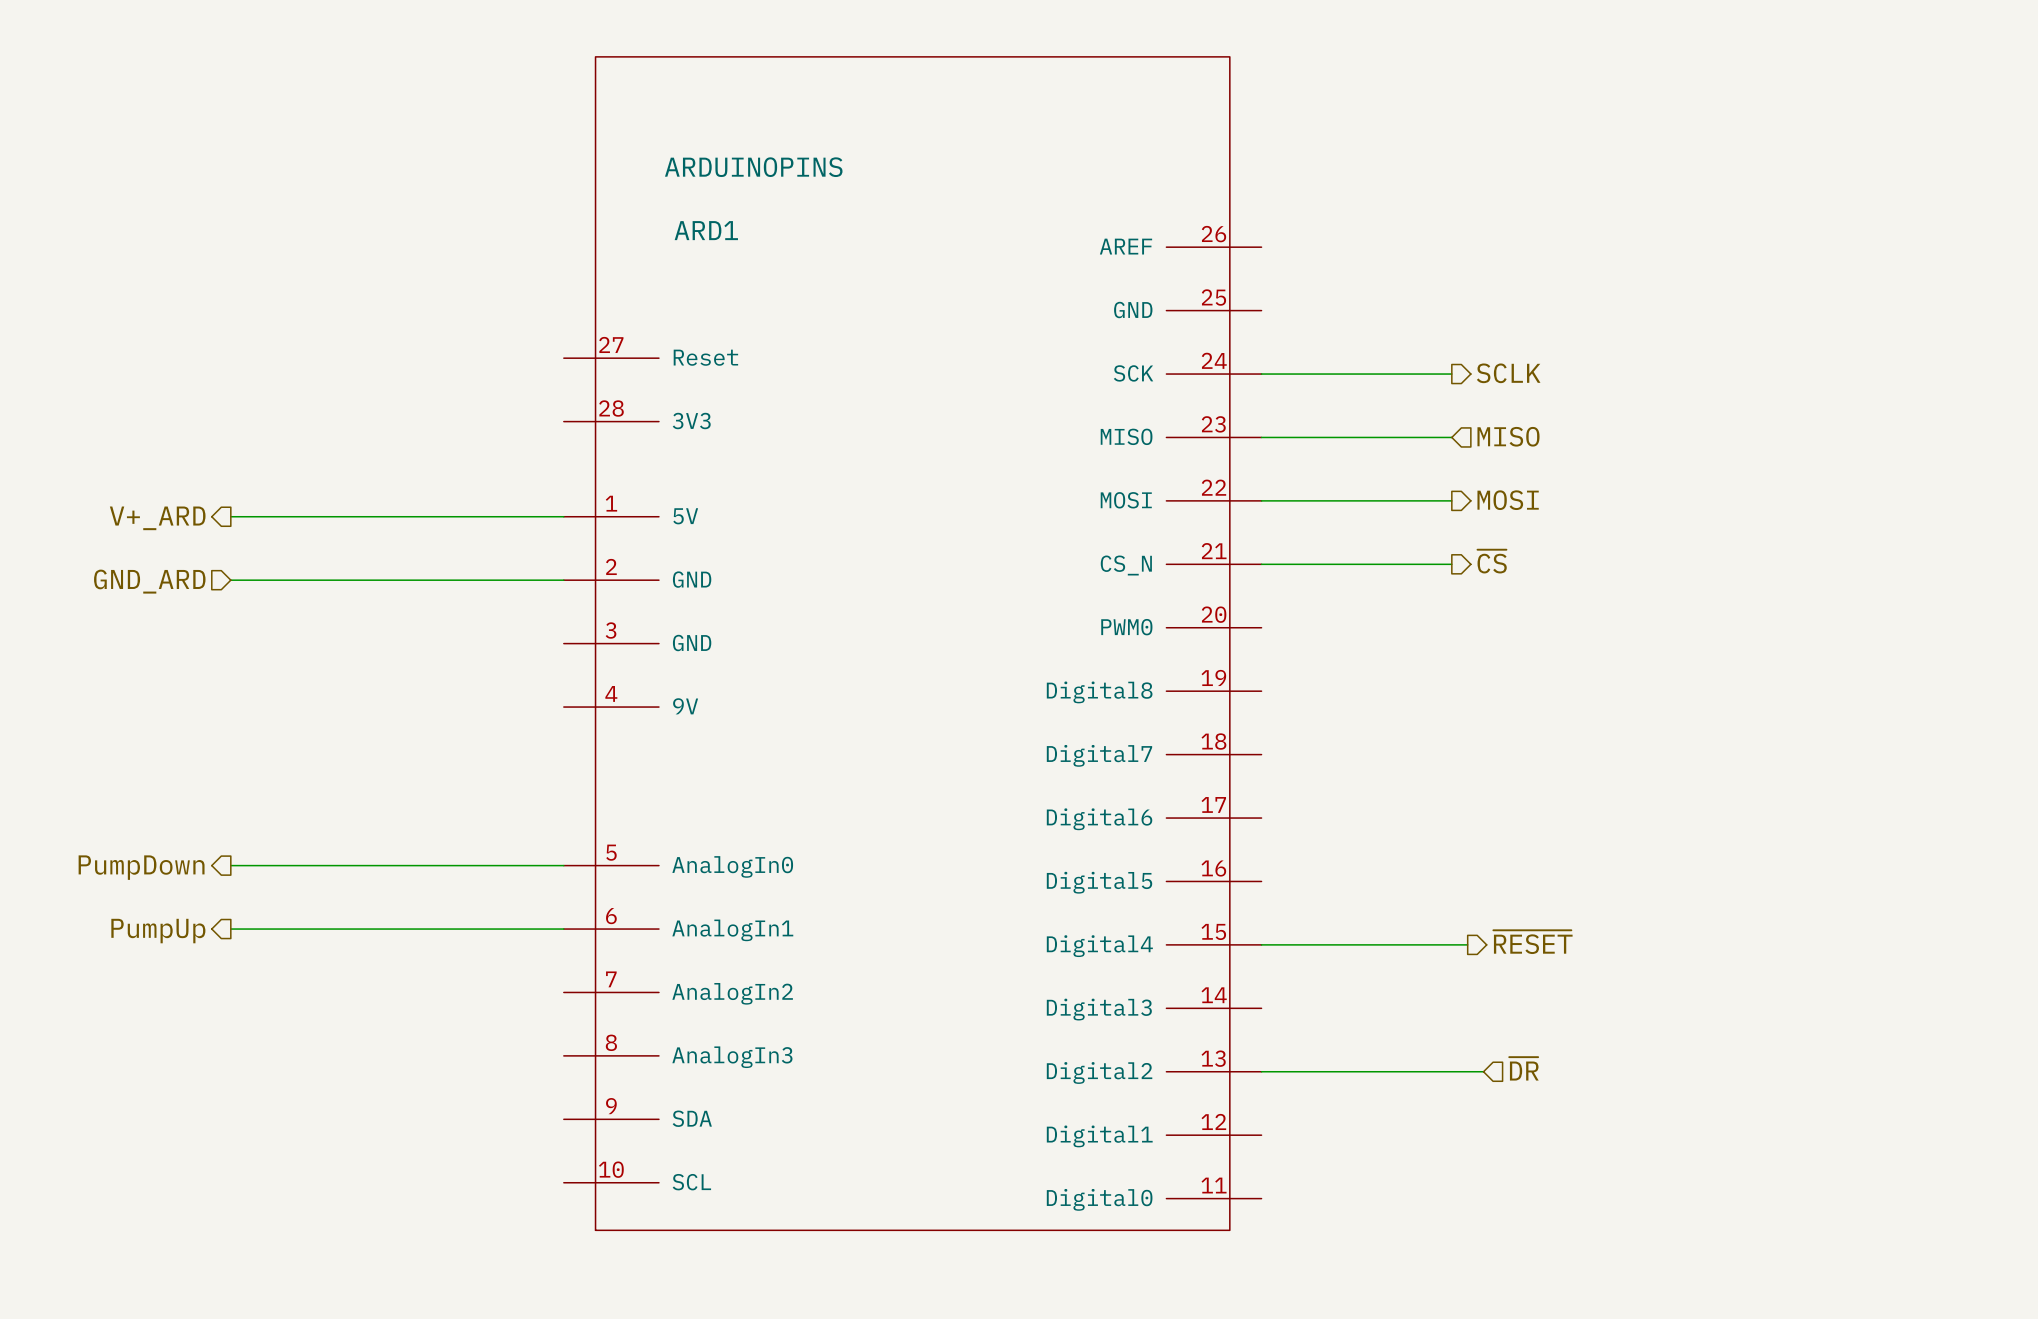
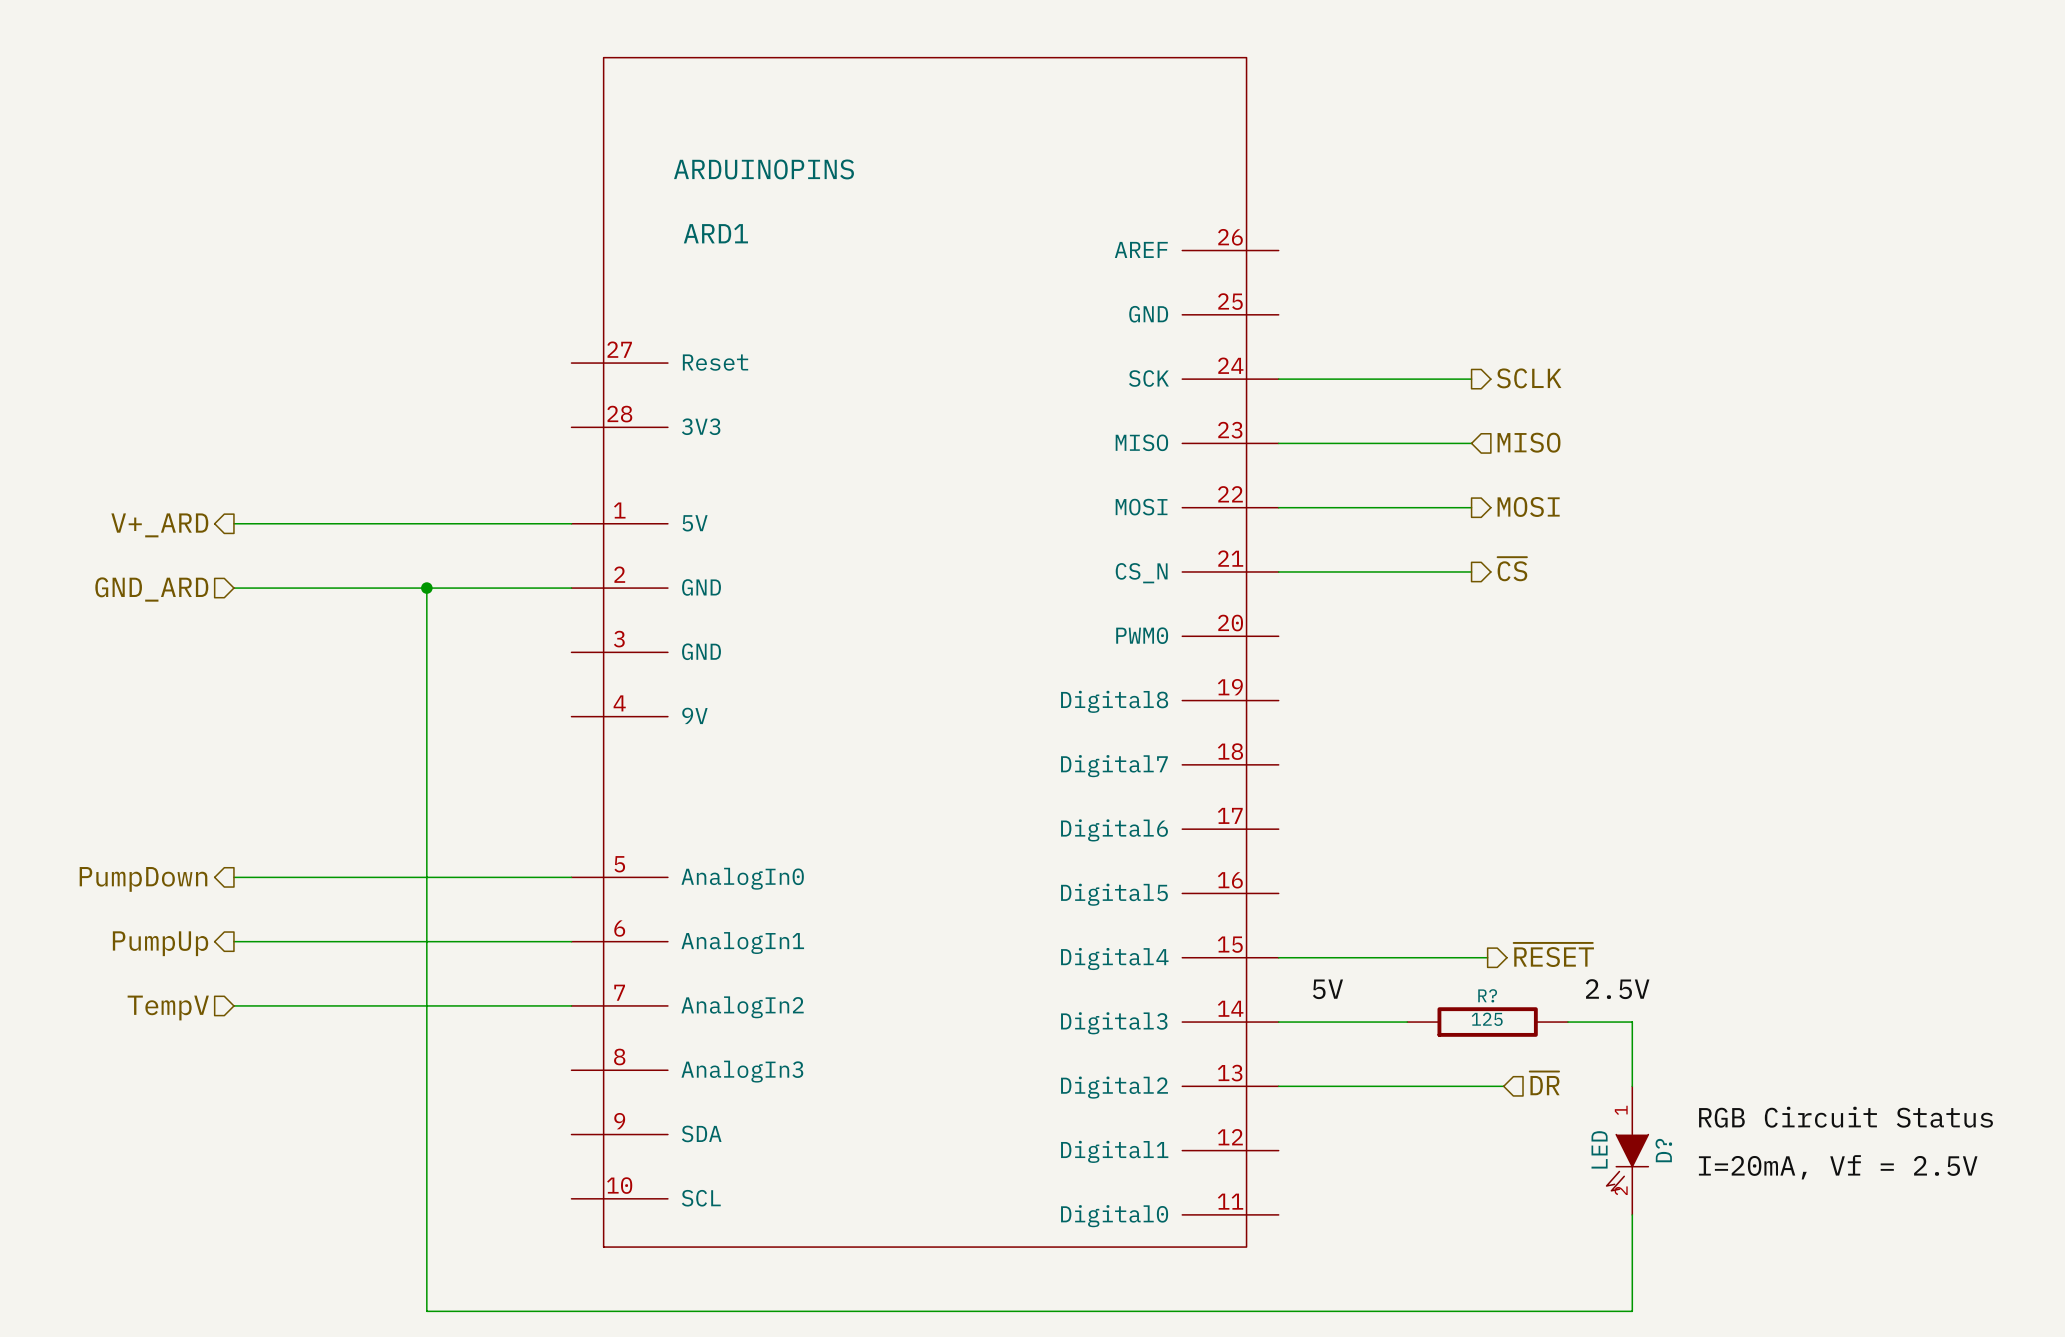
wire: none -> (426, 588) (426, 1311) (1632, 1311) (1632, 1214)
junction: none -> (426, 588)
label: none -> 2.5V (1617, 989)
label: none -> 5V (1327, 989)
wire: none -> (233, 1005) (571, 1005)
hierarchical label: none -> TempV (168, 1008)
wire: none -> (1278, 1022) (1407, 1022)
R?: none -> 125 (1487, 1022)
wire: none -> (1568, 1022) (1632, 1022) (1632, 1086)
label: none -> RGB Circuit Status (1846, 1117)
D?: none -> LED (1627, 1150)
label: none -> I=20mA, Vf = 2.5V (1838, 1167)

